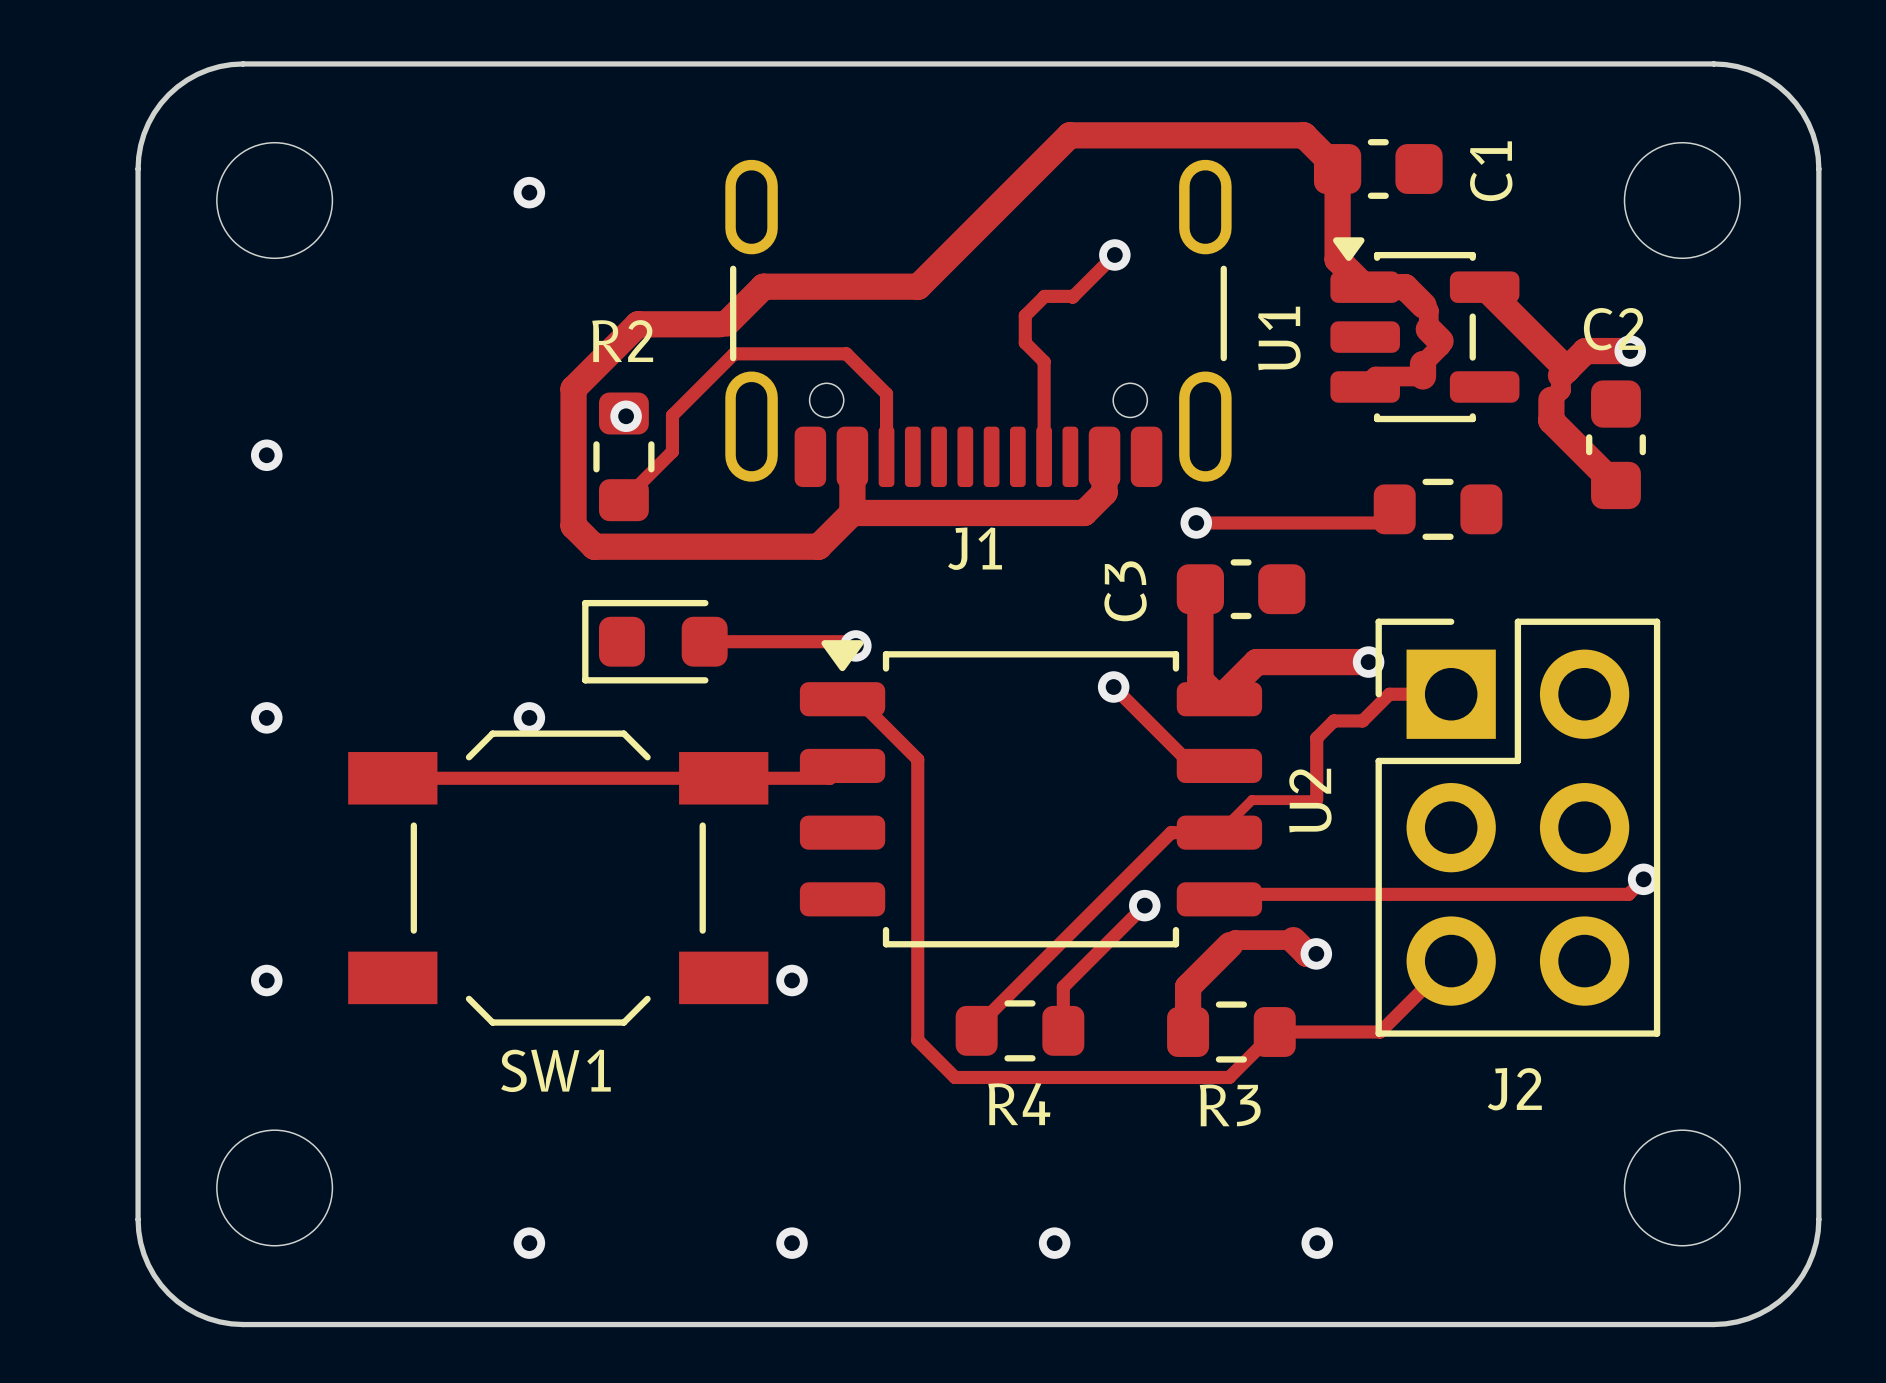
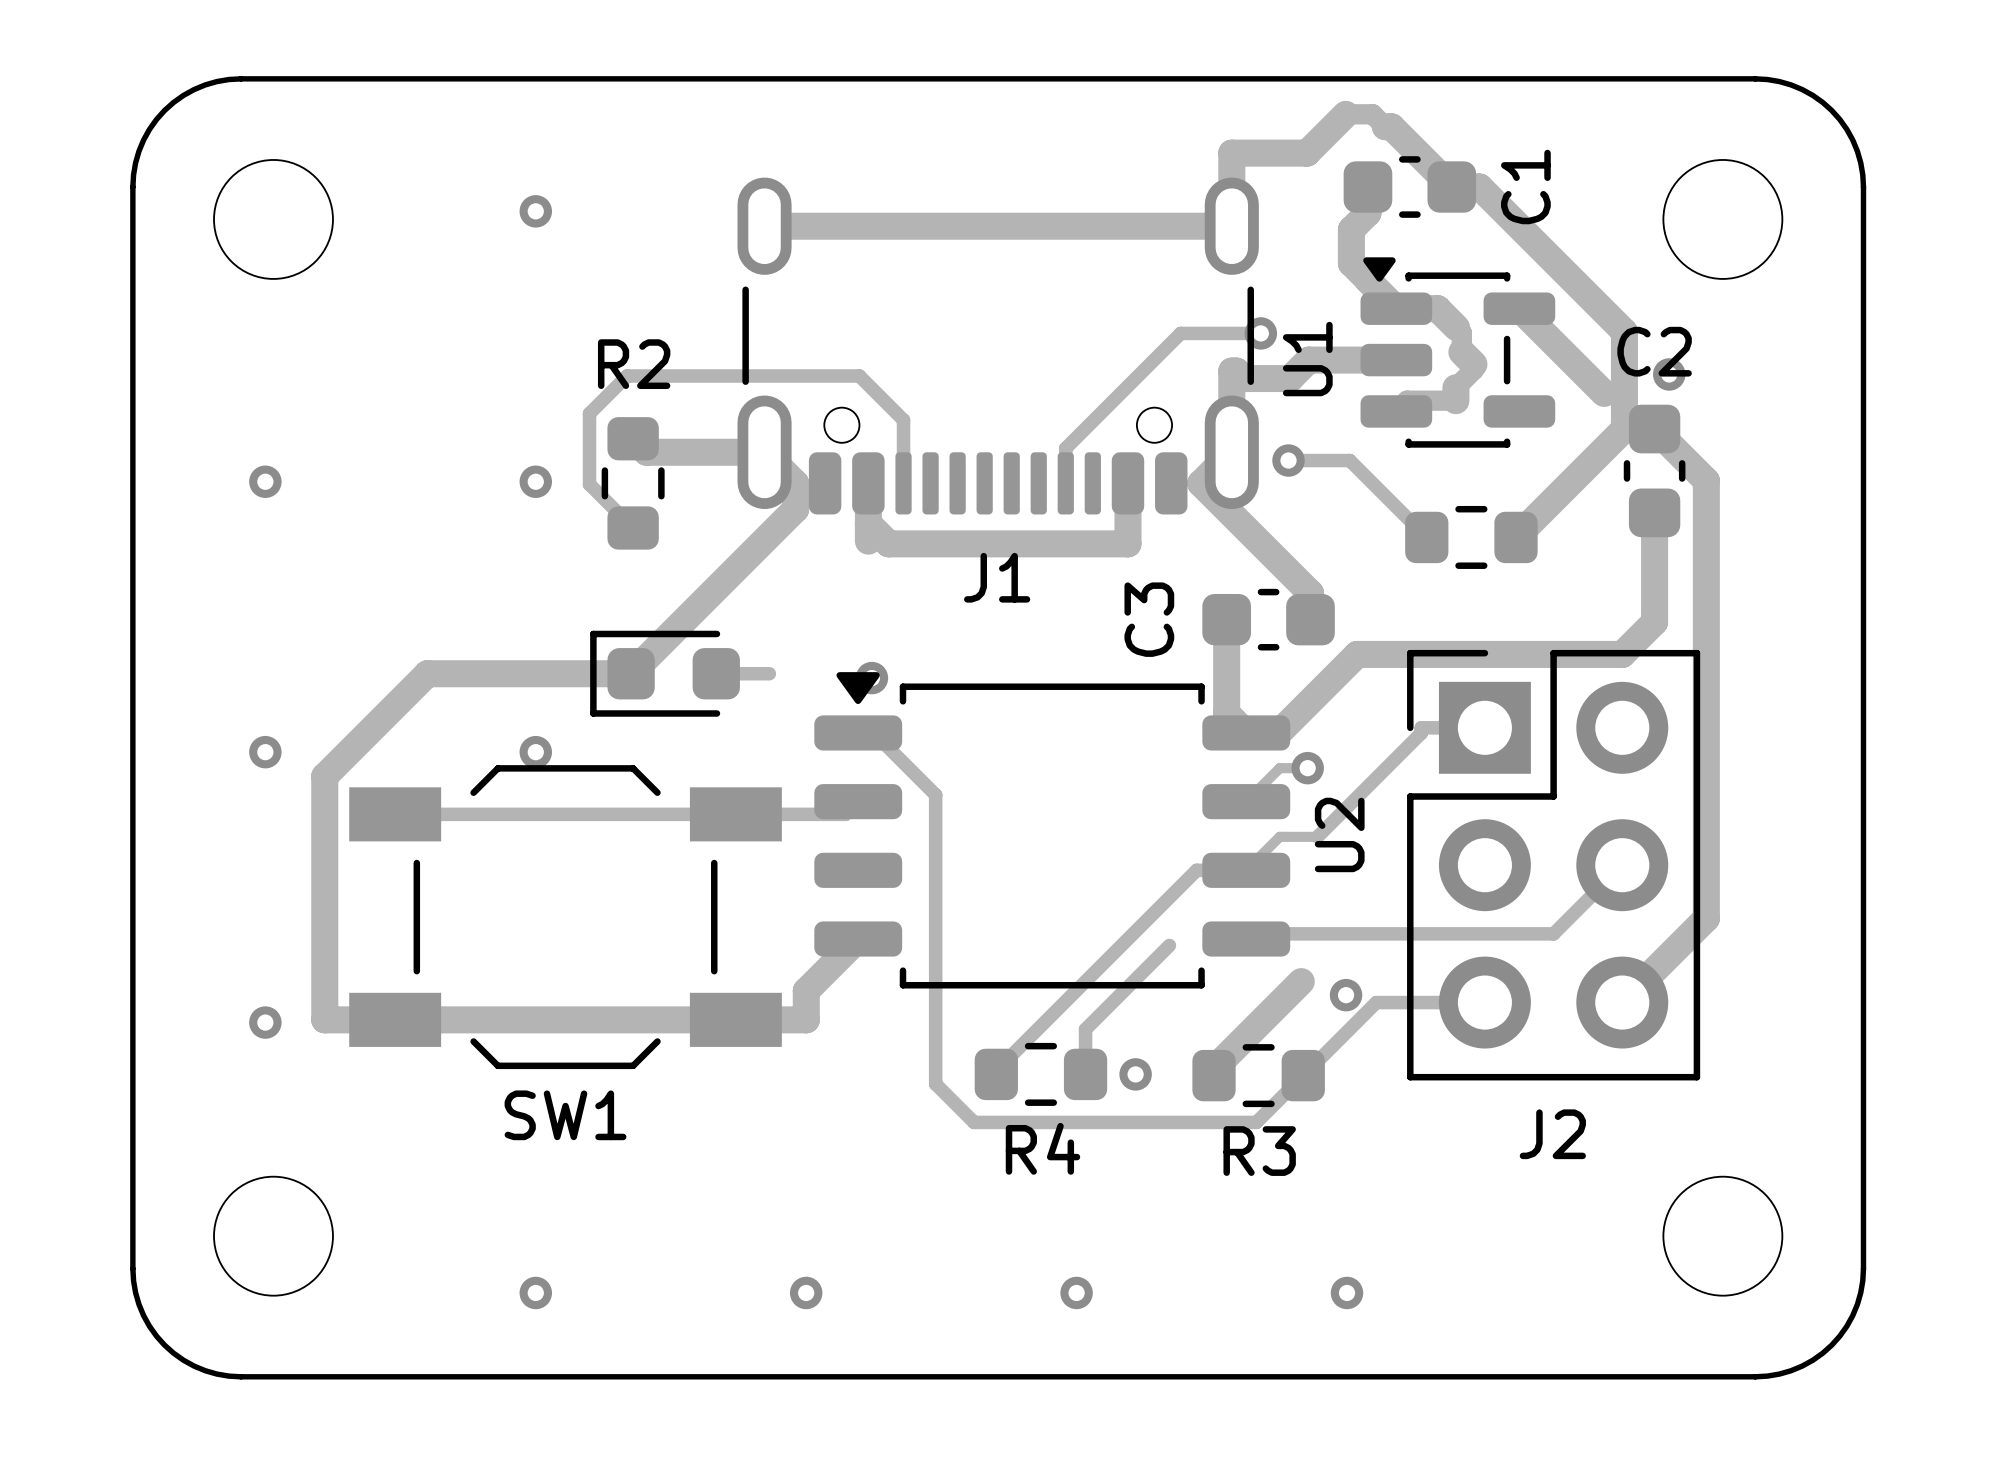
track: (1337, 168) (1303, 135) (1069, 135) (918, 286) (763, 286) (725, 324) (638, 324) (573, 388) (573, 525) (594, 546) (818, 546) (852, 512) (1084, 512) (1104, 492) -> (868, 523) (888, 543) (1127, 543) (1127, 520)
track: (1337, 194) (1337, 259) -> (1367, 213) (1351, 229) (1351, 263) (1367, 279)
track: none -> (764, 226) (1231, 226) (1231, 153) (1307, 153) (1345, 114) (1372, 114) (1385, 126) (1391, 126) (1451, 187) (1479, 187) (1624, 331) (1624, 429)
track: (1114, 254) (1072, 297) (1044, 296) (1025, 315) (1025, 342) (1044, 361) (1044, 422) -> (1260, 333) (1180, 333) (1065, 448)
via: (1114, 254) -> none
via: none -> (1260, 333)
track: none -> (1396, 360) (1308, 360) (1290, 378) (1244, 378) (1236, 371) (1231, 371) (1231, 452) (1200, 483) (1310, 593) (1310, 619)
track: (1630, 351) (1585, 351) (1560, 375) (1560, 390) (1551, 399) (1551, 420) (1615, 485) -> none
track: (886, 395) (846, 353) (734, 353) (672, 415) (672, 451) (623, 500) -> (903, 420) (859, 375) (627, 375) (589, 413) (589, 484) (633, 527)
track: none -> (1624, 429) (1516, 537)
track: none -> (1624, 429) (1654, 429) (1706, 480) (1706, 918) (1622, 1002)
track: none -> (633, 438) (646, 452) (764, 452) (795, 483) (795, 509) (631, 673) (427, 673) (324, 776) (324, 1019) (806, 1019) (806, 990) (858, 939)
via position: (626, 416) -> (535, 481)
via: none -> (1288, 460)
track: (1394, 509) (1381, 522) (1196, 522) -> (1426, 537) (1349, 460) (1288, 460)
via: (1196, 522) -> none
track: (756, 641) (851, 641) (855, 645) -> none
track: (1368, 662) (1256, 662) (1219, 699) -> (1654, 512) (1654, 622) (1622, 654) (1357, 654) (1278, 732) (1246, 732)
via: (1368, 662) -> none
track: (1113, 687) (1192, 765) (1219, 765) -> (1307, 768) (1279, 768) (1246, 801)
via: (1113, 687) -> none
track: (1389, 694) (1362, 720) (1333, 720) (1316, 738) (1316, 800) (1288, 800) -> (1421, 727) (1421, 733) (1317, 836)
via: none -> (1307, 768)
track: (1643, 879) (1628, 894) (1517, 894) -> (1622, 865) (1553, 933)
via: (1643, 879) -> none
via: (1144, 905) -> none
track: (1316, 953) (1307, 953) (1293, 940) (1234, 940) (1188, 987) (1188, 1025) -> (1301, 981) (1214, 1068)
track: (1451, 961) (1380, 1032) (1274, 1032) -> (1484, 1002) (1376, 1002) (1303, 1075)
via: (792, 980) -> none
via: none -> (1135, 1074)

